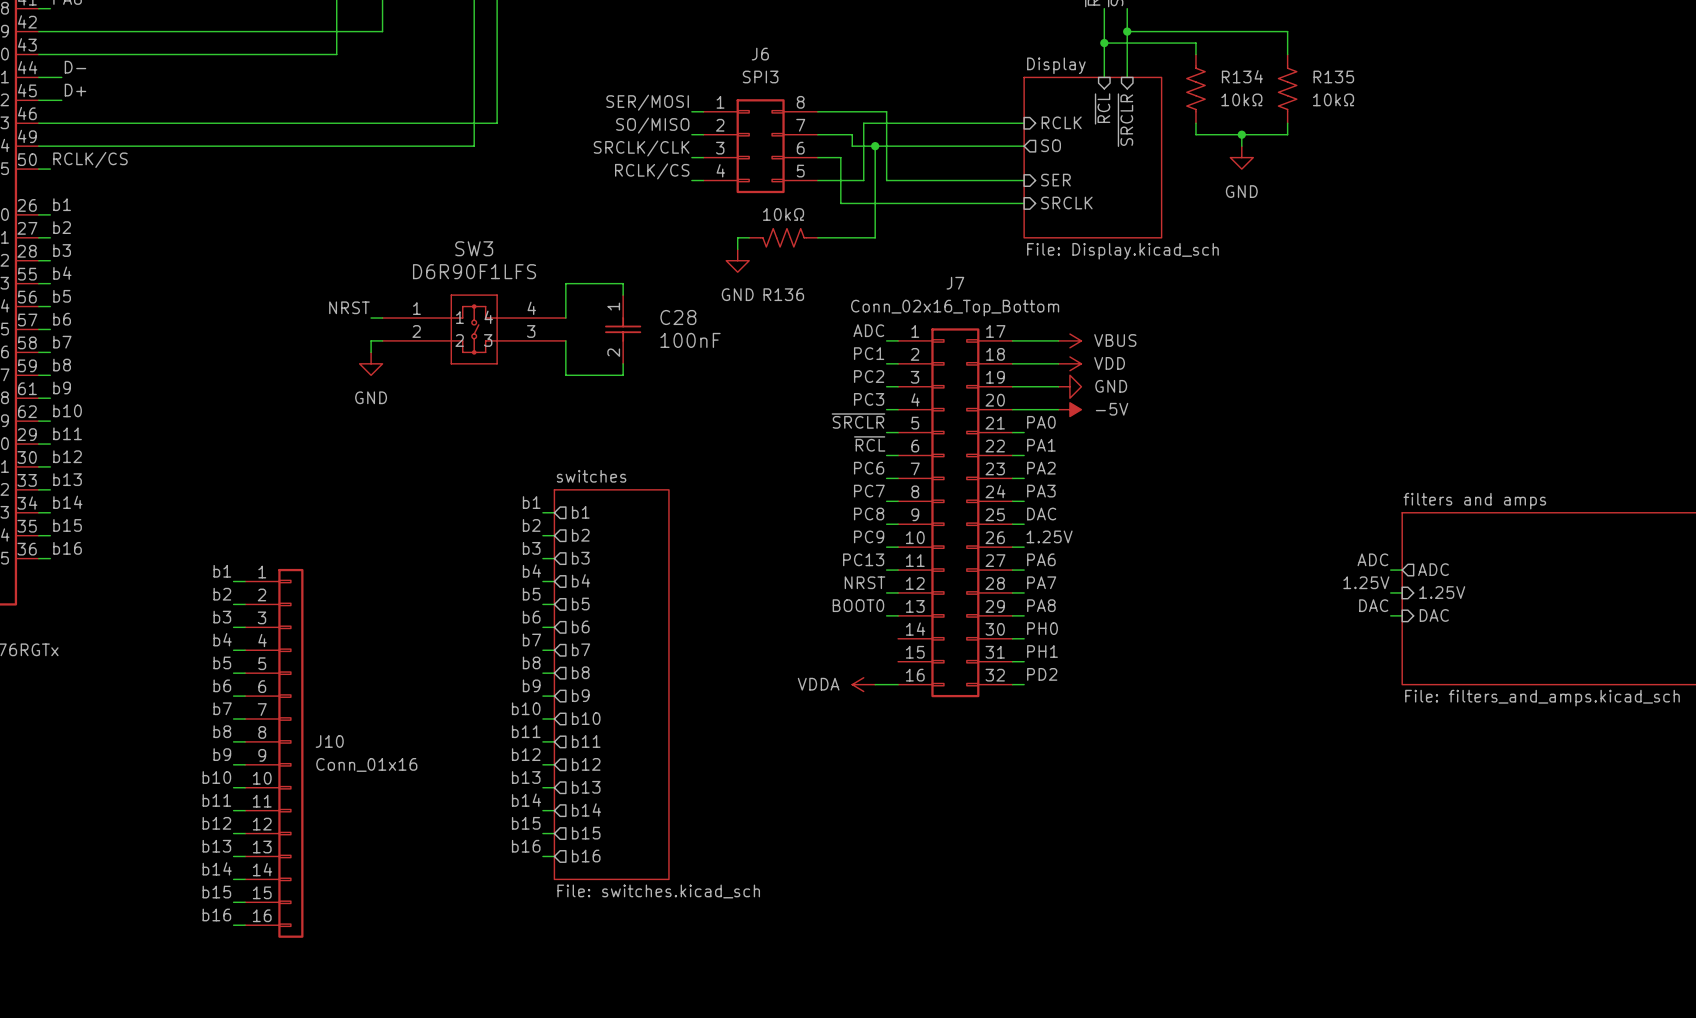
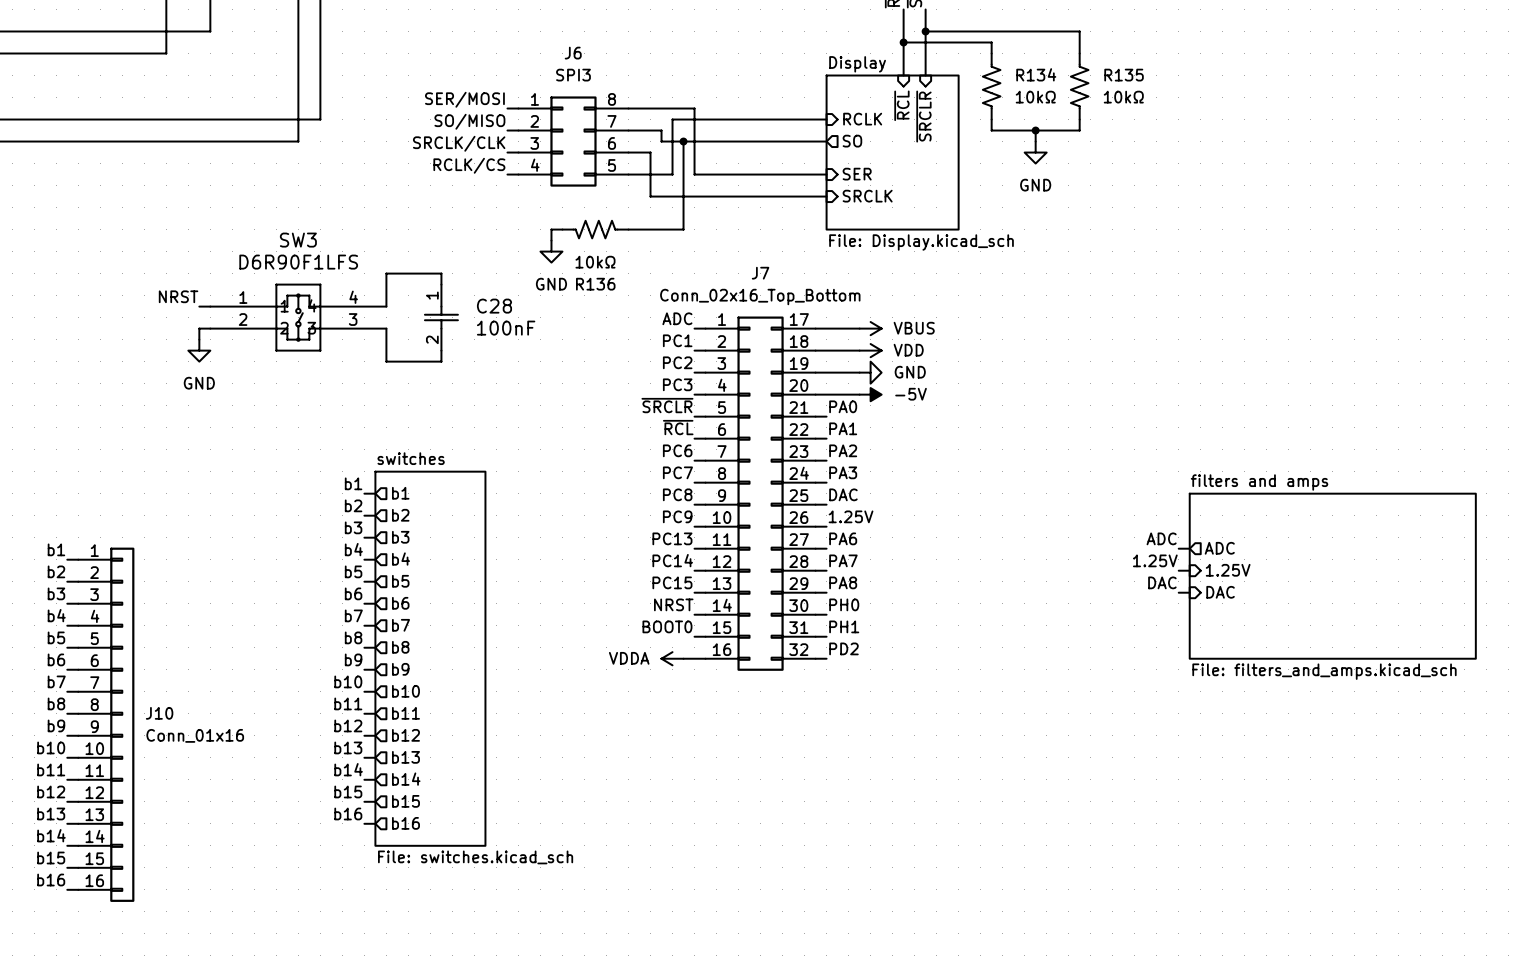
R136 value position: 10kΩ (783, 214) -> 10kΩ (595, 262)
label: NRST (865, 582) -> PC14 (672, 560)
label: BOOT0 (858, 605) -> PC15 (672, 582)
label: none -> NRST (673, 604)
wire: none -> (694, 614) (705, 614)
label: none -> BOOT0 (667, 626)
wire: none -> (694, 636) (705, 636)

